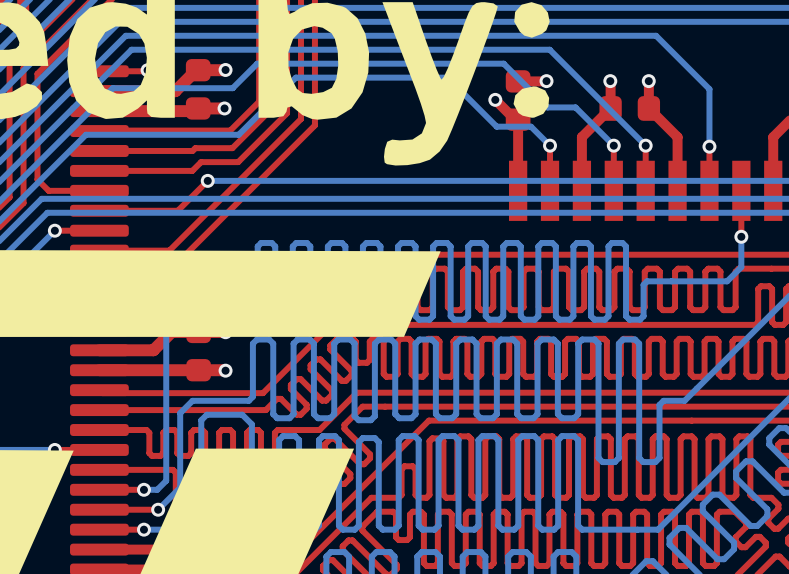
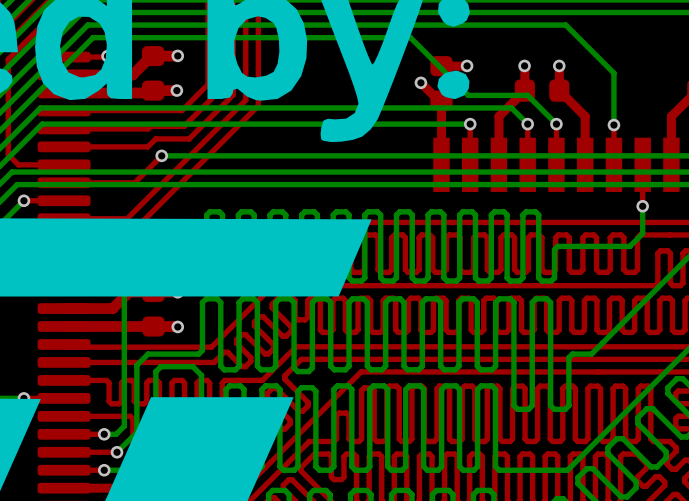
bottom track: (483, 49) (549, 49) (613, 113) -> (410, 37) (468, 95) (527, 95)
bottom track: (595, 127) (575, 107) (547, 107) (503, 63) (257, 63) (232, 88) (112, 88) (73, 127) -> (511, 107) (40, 107)
bottom track: (550, 145) (531, 126) (496, 126) (447, 77) (295, 77) (238, 134) (85, 134) (75, 145) -> (470, 124) (42, 124)

